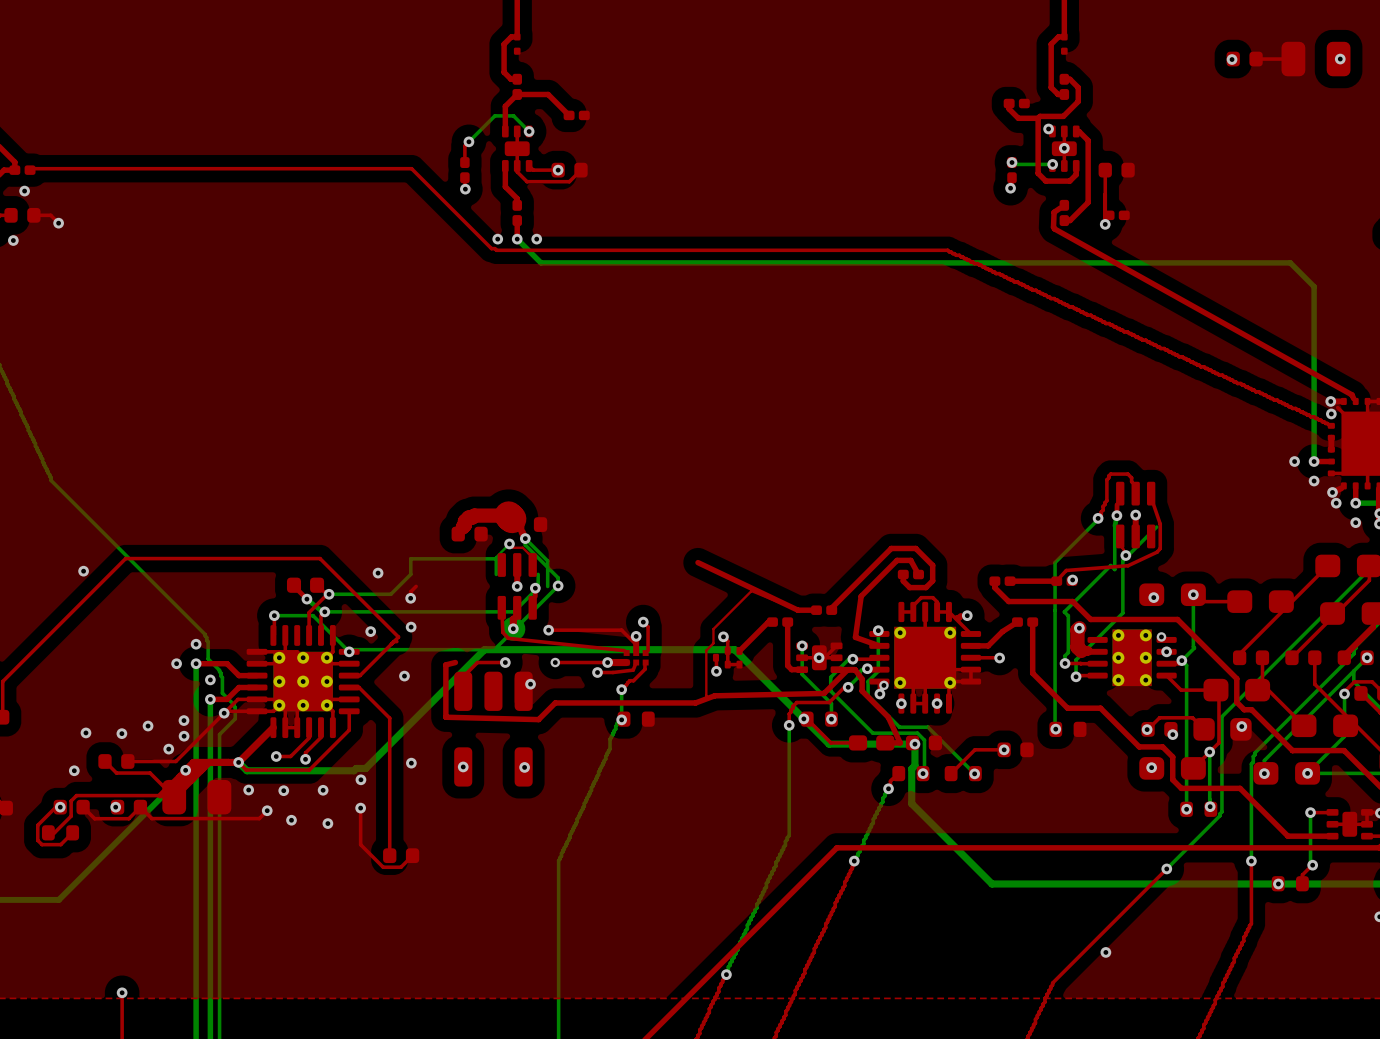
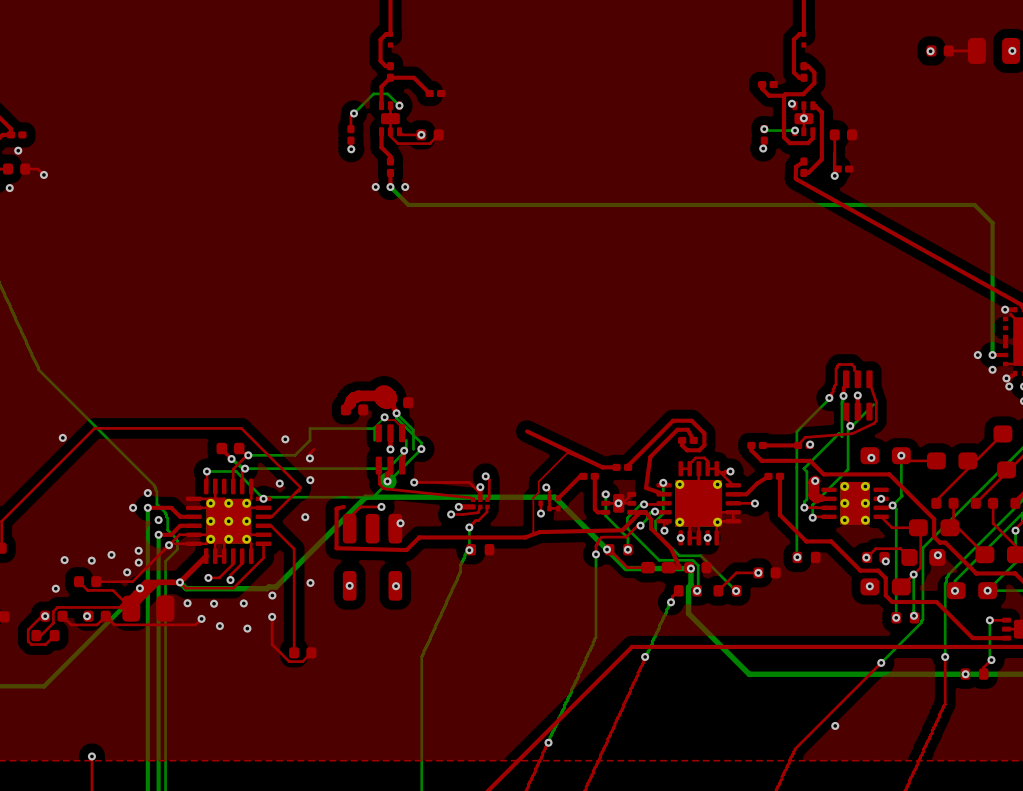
top track: (30, 170) (28, 168) (411, 168) (491, 248) (496, 250) (947, 250) (1331, 425) -> none
via: (1331, 413) -> none
via: (1161, 636) -> none
top track: (555, 662) (626, 662) -> none
via: (555, 662) -> none
via: (883, 685) -> none

